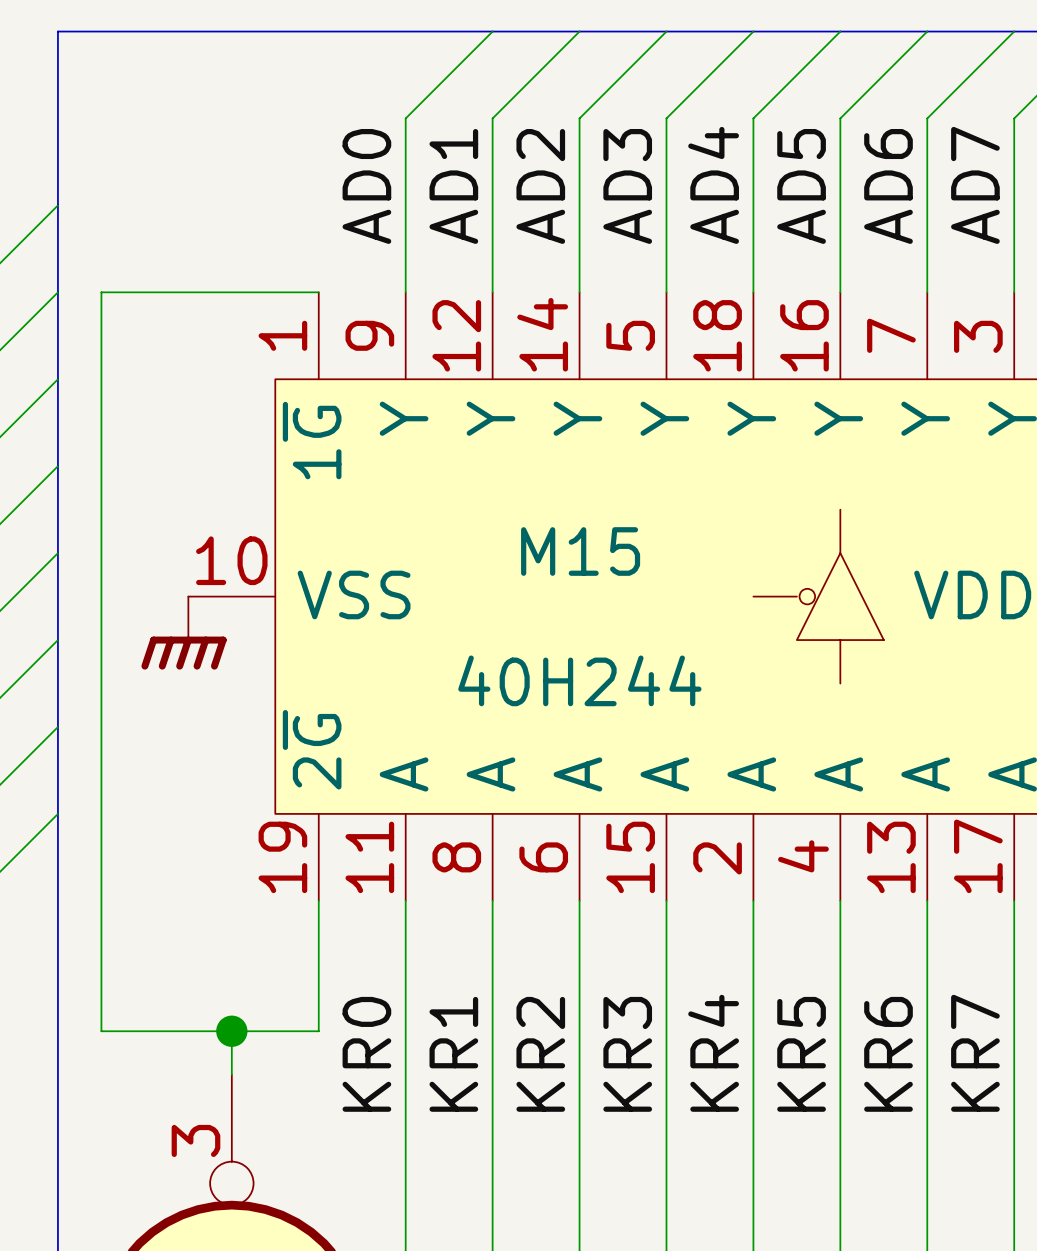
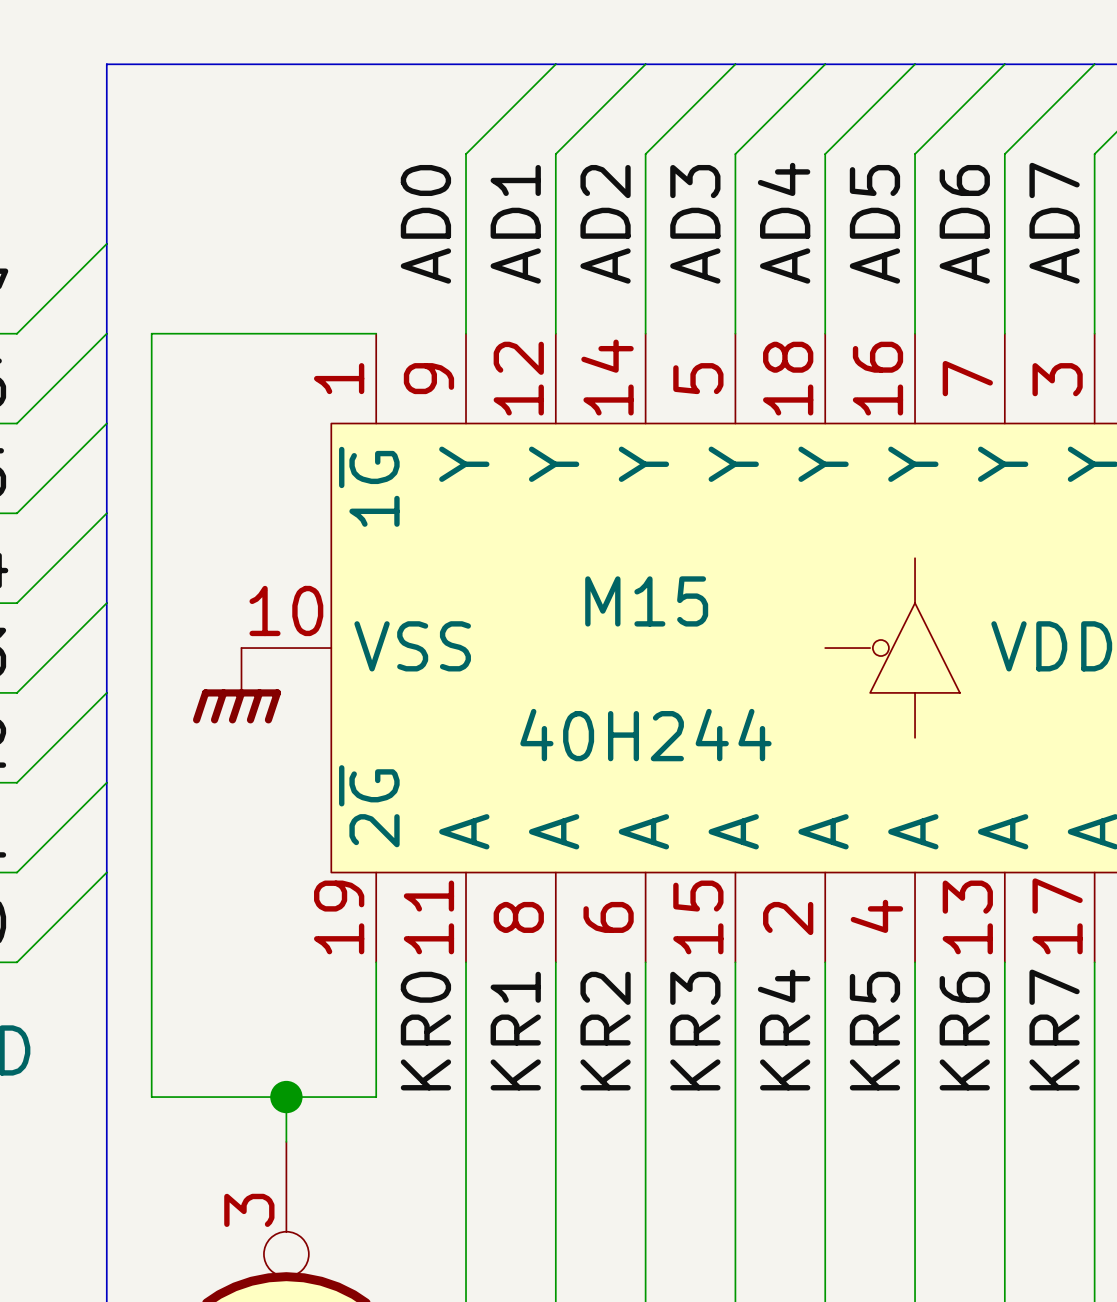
label position: KR4 (713, 1053) -> KR4 (784, 1030)
label position: KR7 (975, 1053) -> KR7 (1054, 1030)
label position: KR0 (366, 1054) -> KR0 (425, 1031)
label position: KR1 (453, 1054) -> KR1 (515, 1031)
label position: KR2 (540, 1054) -> KR2 (605, 1031)
label position: KR3 (627, 1054) -> KR3 (695, 1031)
label position: KR5 (801, 1054) -> KR5 (874, 1031)
label position: KR6 (888, 1054) -> KR6 (964, 1031)

